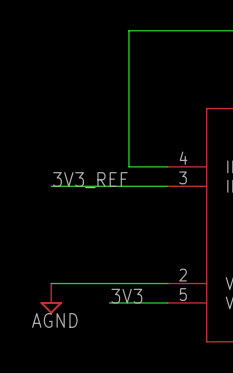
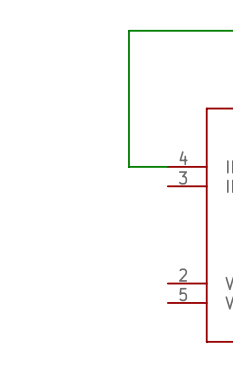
label: 3V3_REF (90, 180) -> none
wire: (51, 186) (167, 186) -> none
wire: (51, 283) (167, 283) -> none
label: 3V3 (126, 296) -> none
power symbol: AGND (51, 298) -> none
wire: (109, 302) (167, 302) -> none

